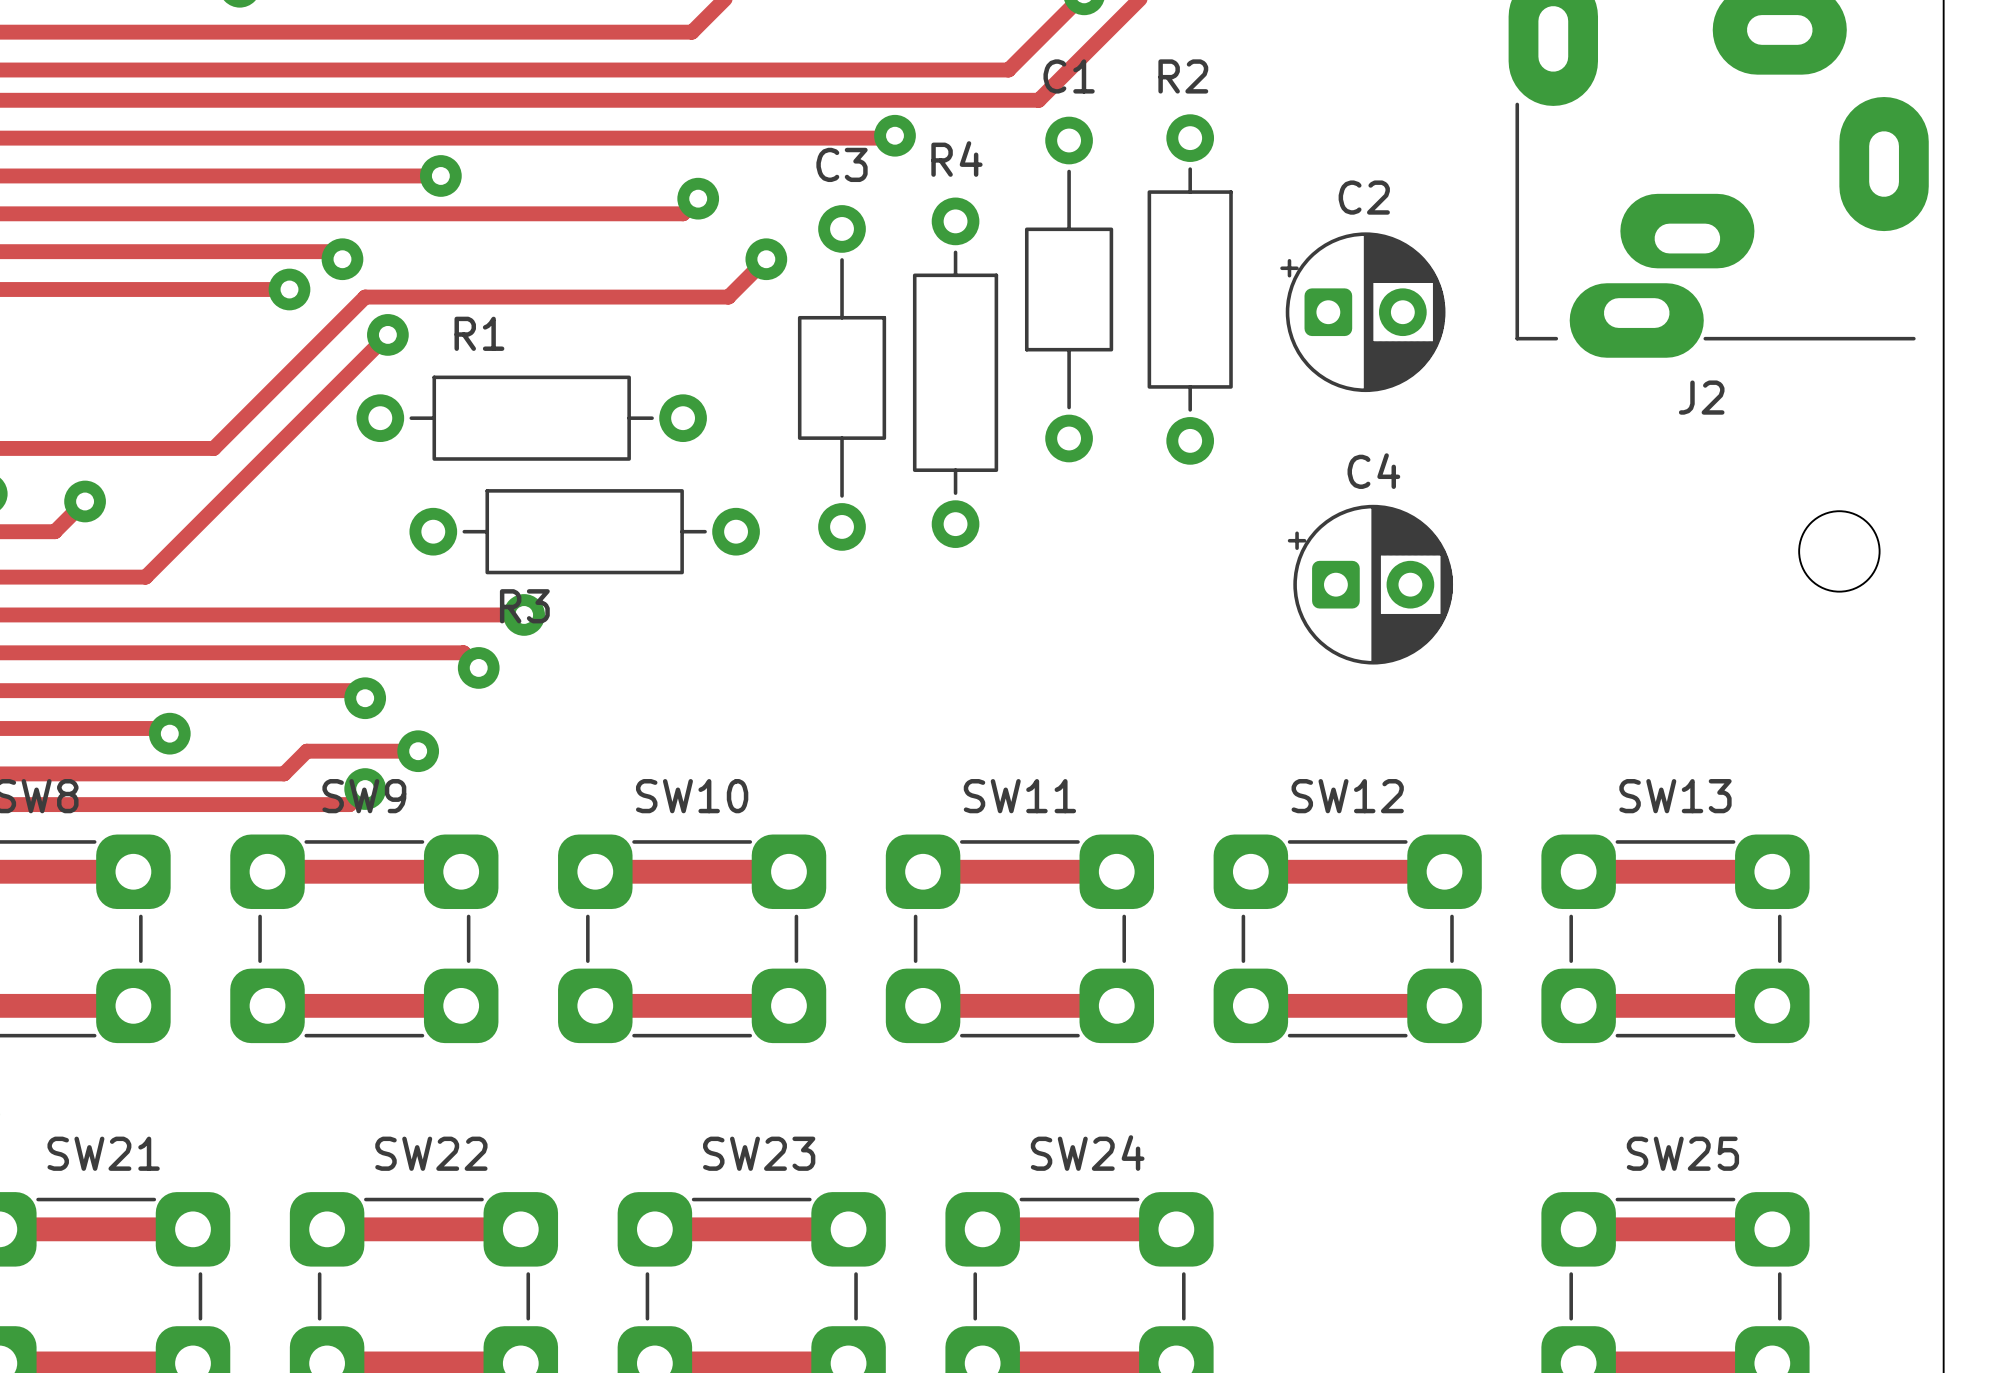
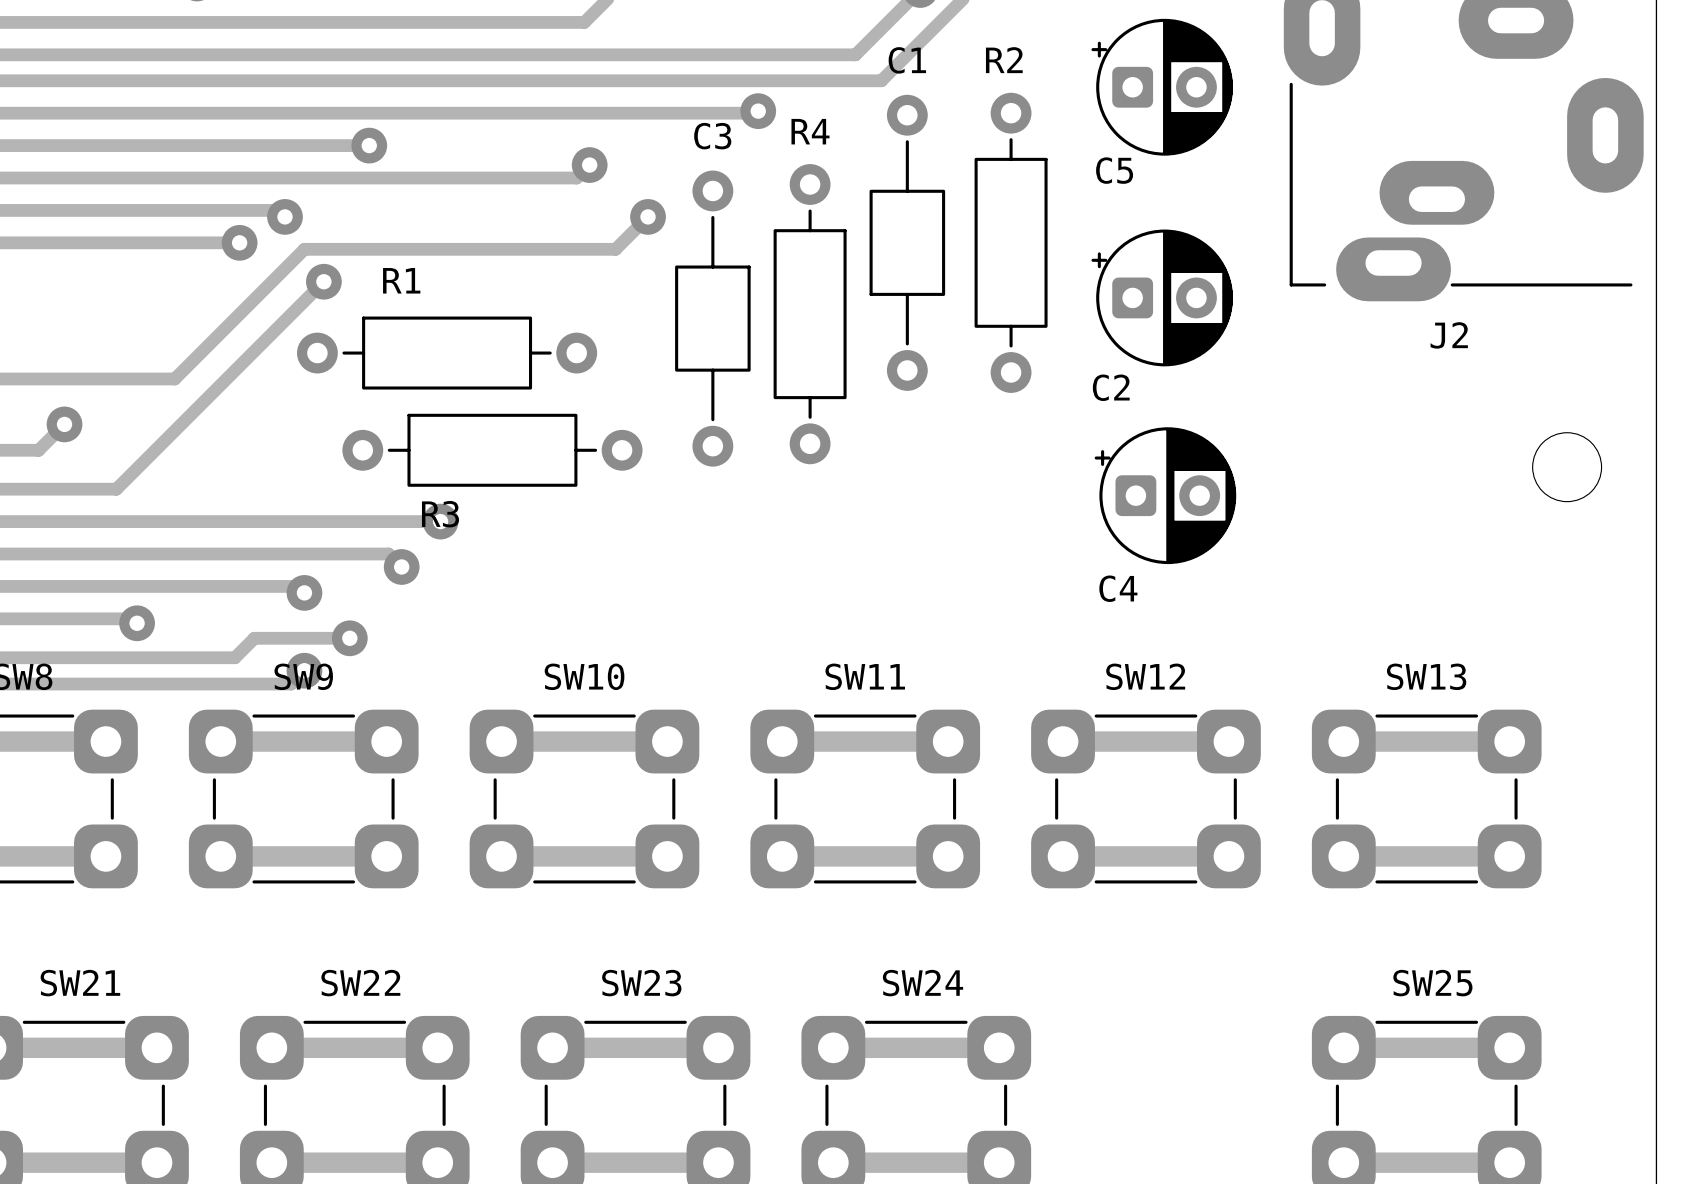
C5: none -> (1162, 87)
C2 name position: C2 (1364, 197) -> C2 (1111, 387)
C2 position: (1362, 312) -> (1162, 297)
C4 name position: C4 (1373, 471) -> C4 (1118, 588)

